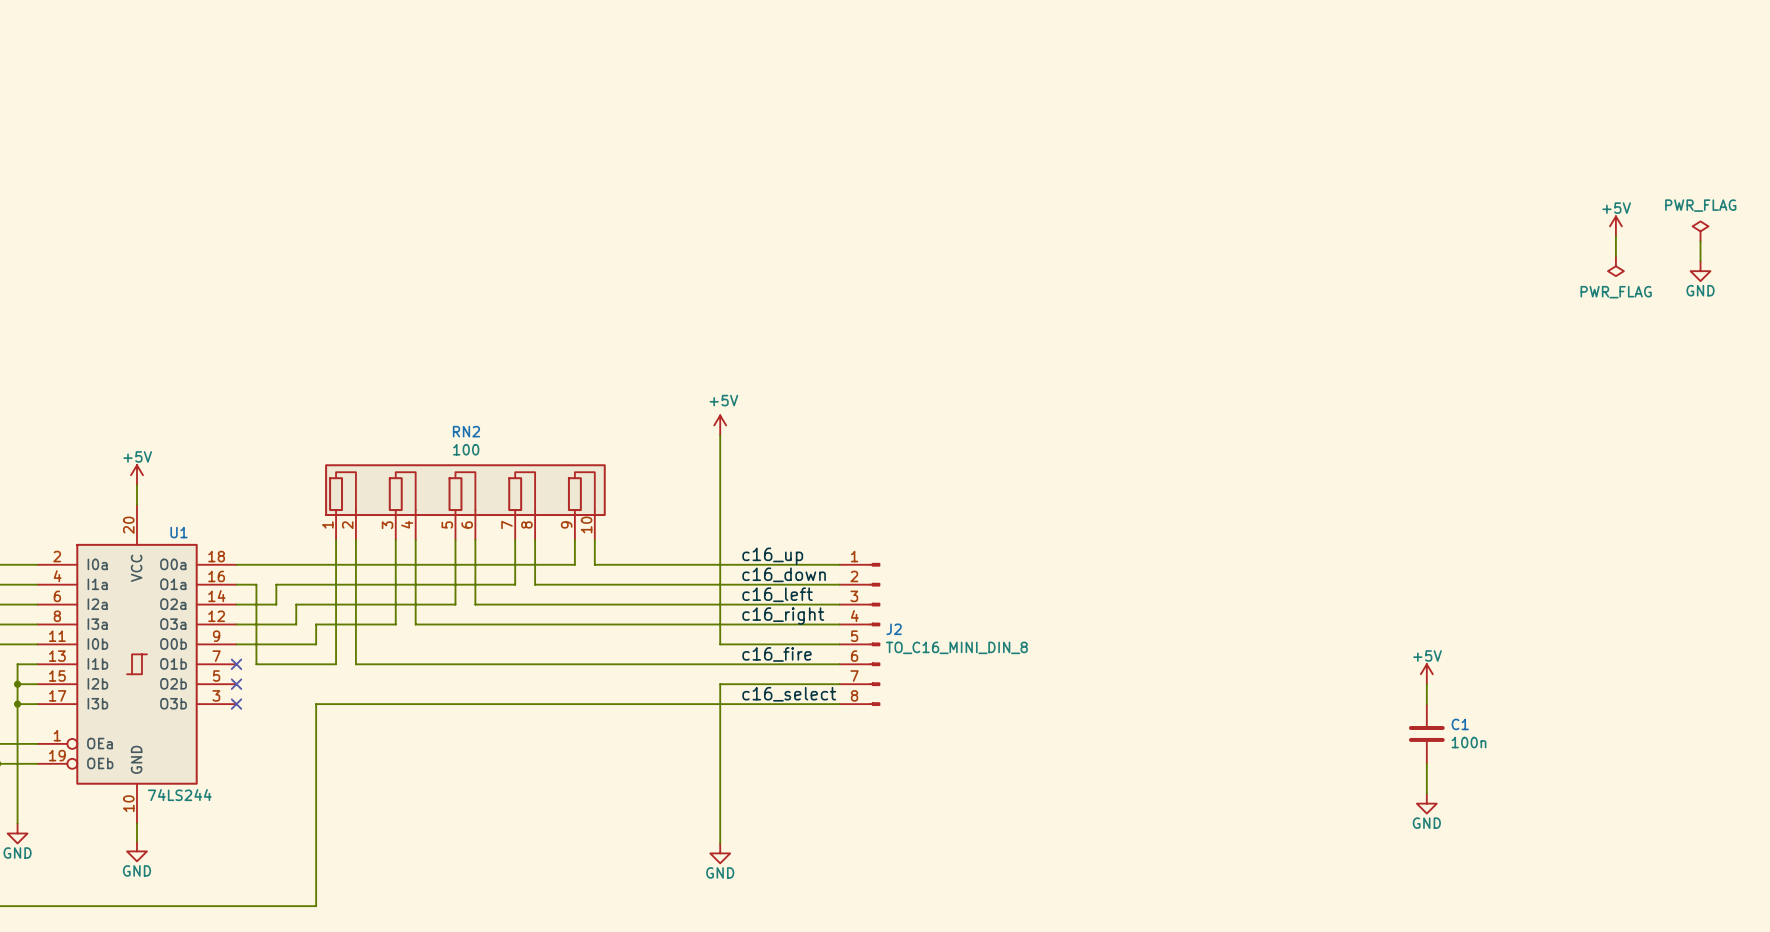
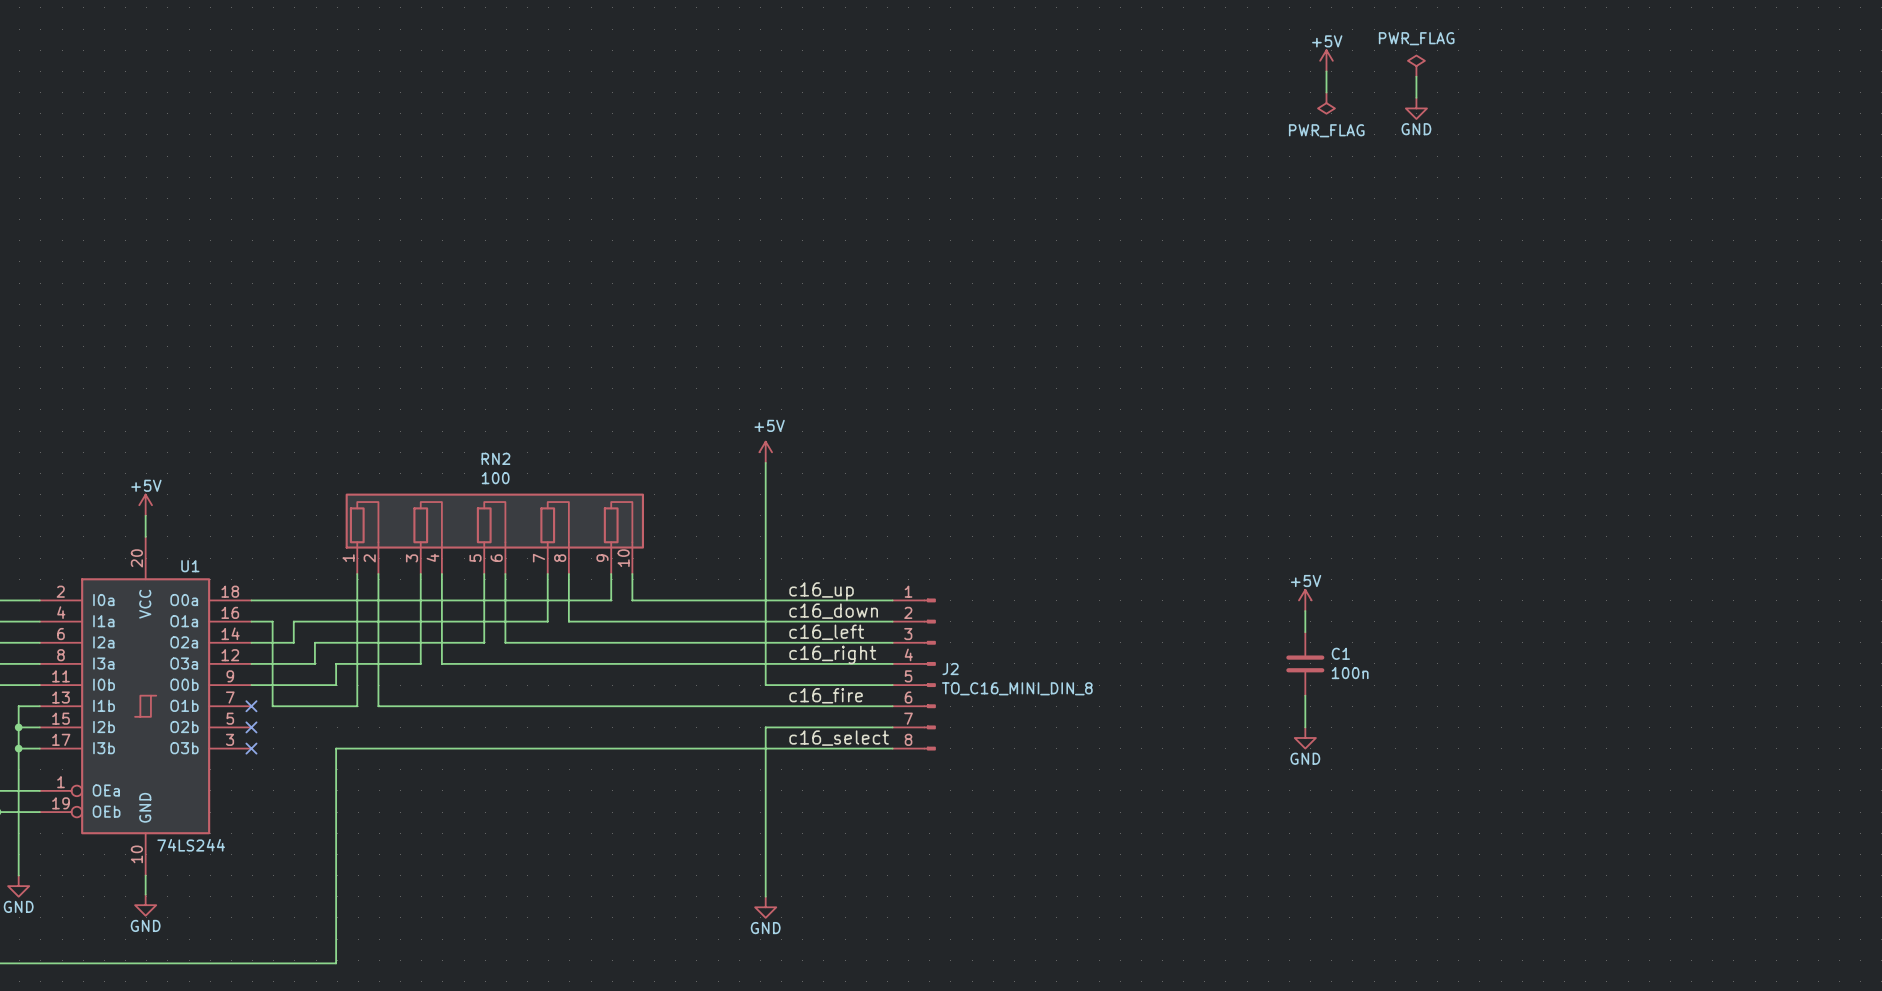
power symbol: none -> +5V (1326, 60)
power symbol: none -> PWR_FLAG (1416, 66)
wire: none -> (1326, 71) (1326, 92)
wire: none -> (1416, 76) (1416, 97)
power symbol: none -> PWR_FLAG (1326, 103)
power symbol: none -> GND (1416, 108)
power symbol: +5V (1615, 226) -> none
power symbol: PWR_FLAG (1700, 231) -> none
wire: (1615, 236) (1615, 256) -> none
wire: (1700, 241) (1700, 261) -> none
power symbol: PWR_FLAG (1615, 266) -> none
power symbol: GND (1700, 271) -> none
power symbol: none -> +5V (1305, 600)
wire: none -> (1305, 611) (1305, 632)
wire: none -> (1305, 695) (1305, 727)
power symbol: +5V (1426, 674) -> none
wire: (1426, 684) (1426, 704) -> none
power symbol: none -> GND (1305, 737)
C1 position: (1426, 733) -> (1305, 663)
wire: (1426, 763) (1426, 793) -> none
power symbol: GND (1426, 803) -> none

